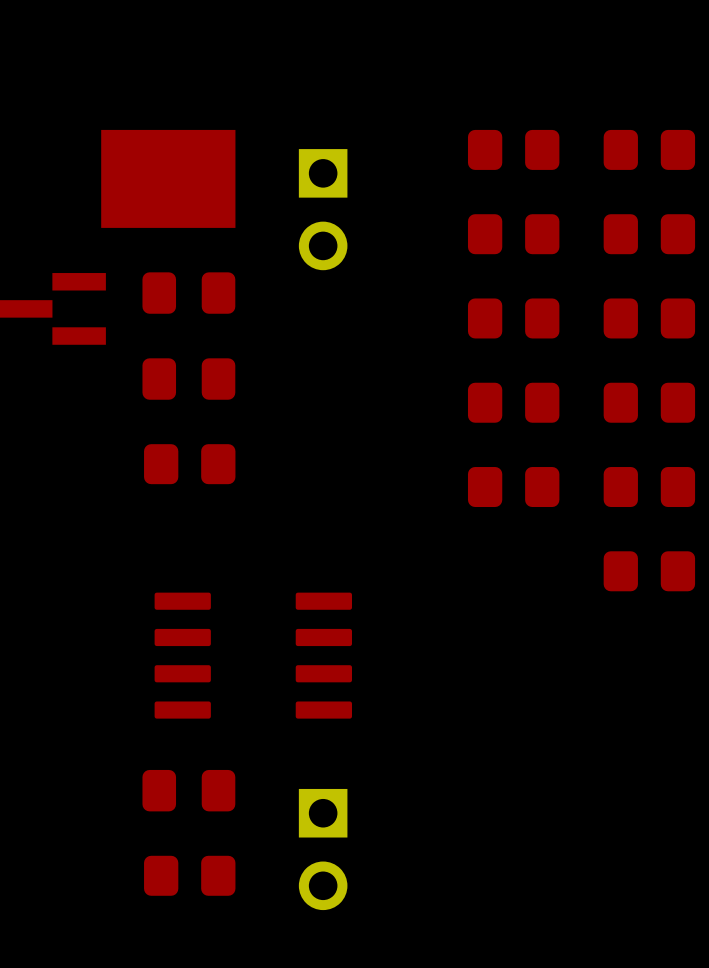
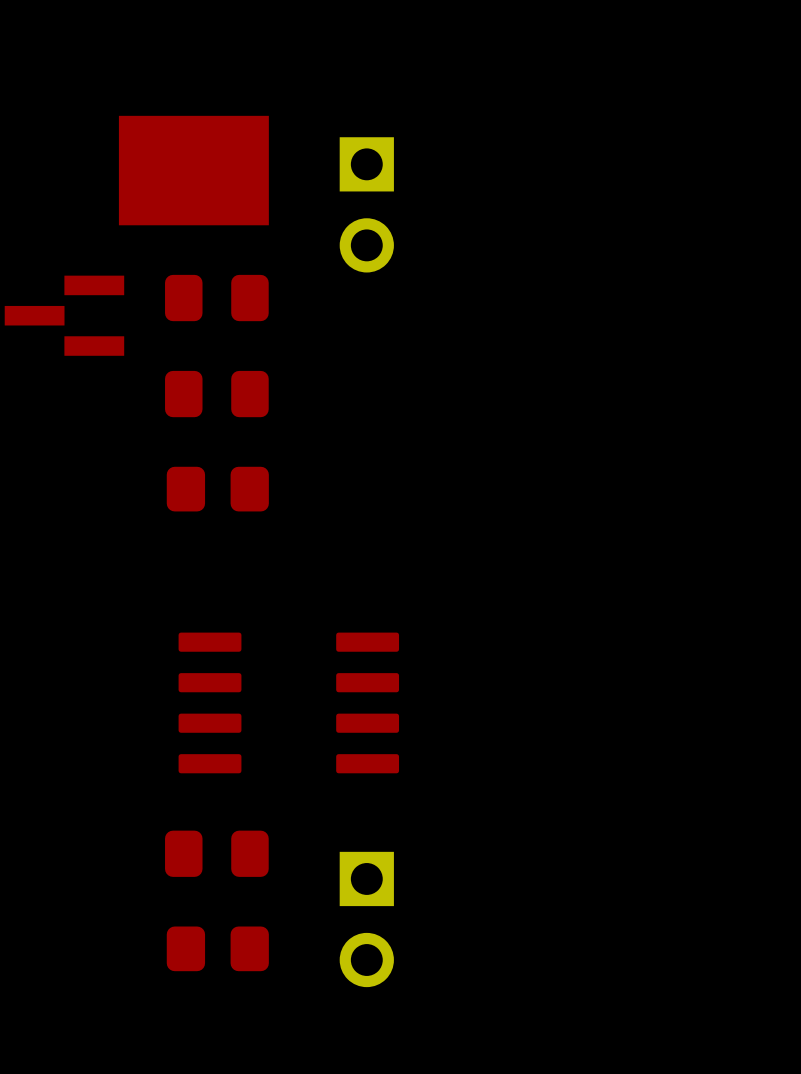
part: (513, 149) -> none
part: (649, 149) -> none
part: (513, 234) -> none
part: (649, 234) -> none
part: (513, 318) -> none
part: (649, 318) -> none
part: (513, 402) -> none
part: (649, 402) -> none
part: (513, 487) -> none
part: (649, 487) -> none
part: (649, 571) -> none

